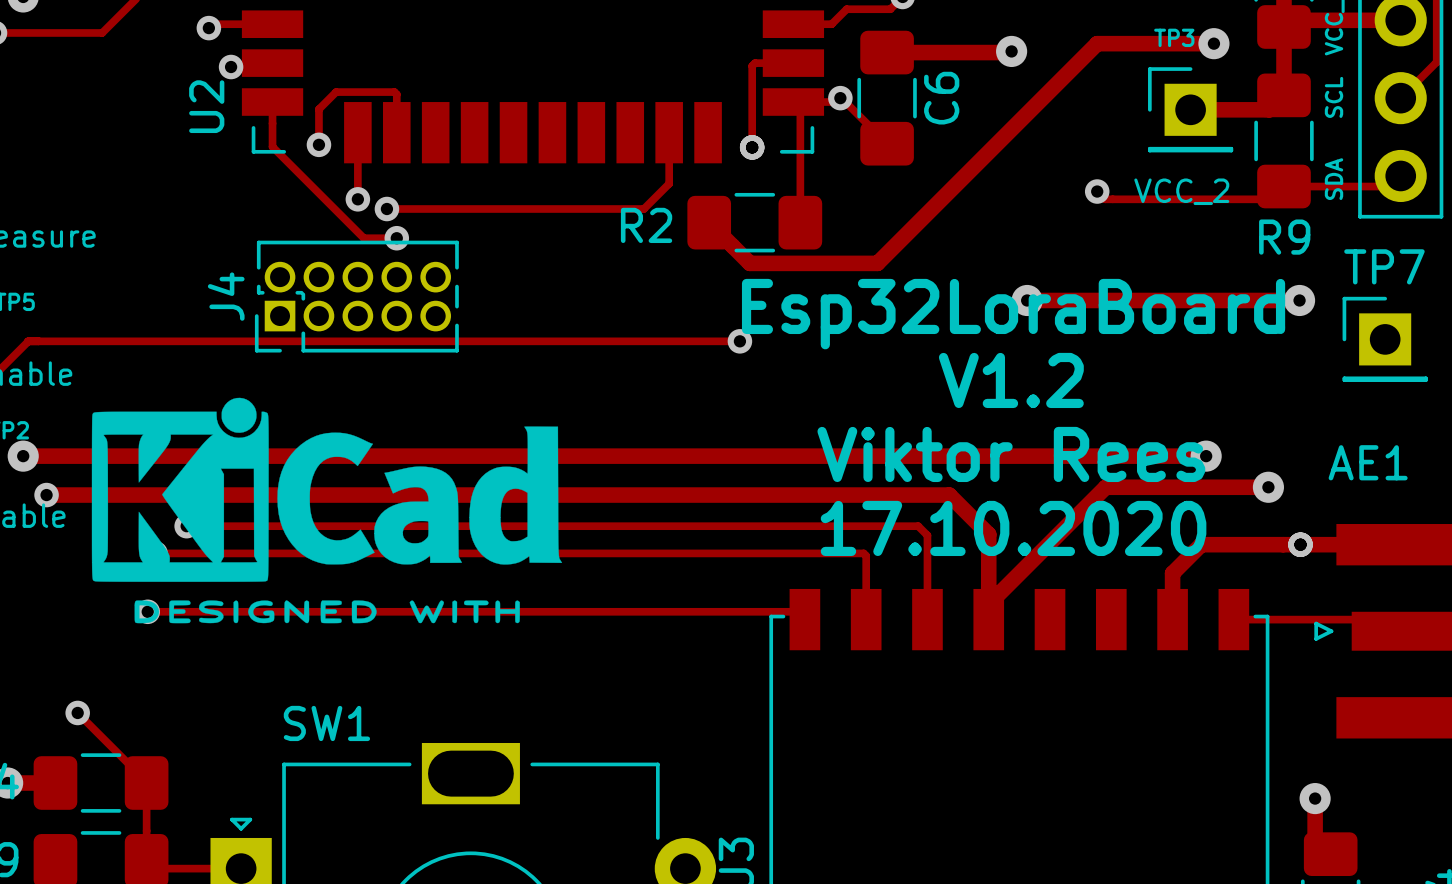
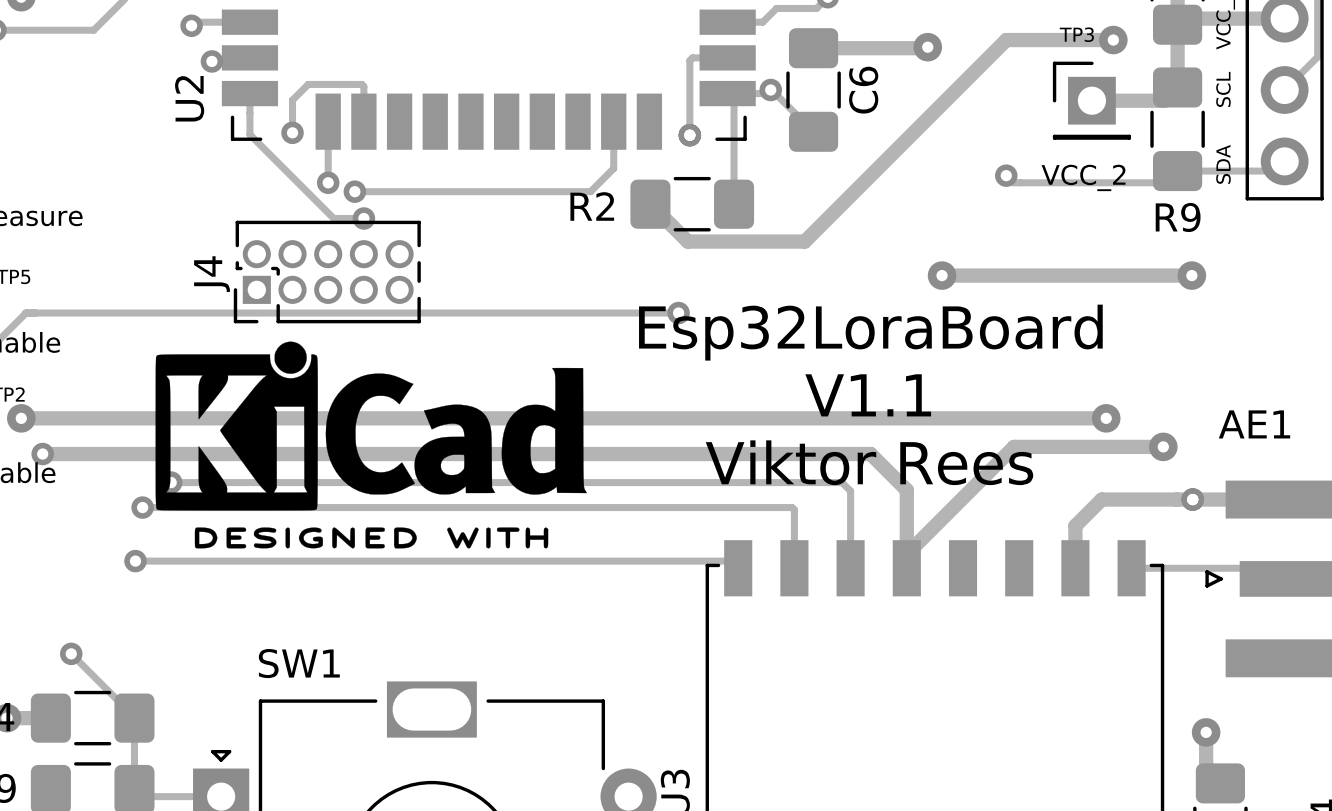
text position: Esp32LoraBoard (1013, 314) -> Esp32LoraBoard (870, 332)
TP7: (1385, 339) -> none
text: V1.2 (1011, 380) -> V1.1 (868, 395)
text position: Viktor Rees (1011, 454) -> Viktor Rees (869, 462)
drawing position: (326, 510) -> (371, 445)
text: 17.10.2020 (1013, 528) -> none

